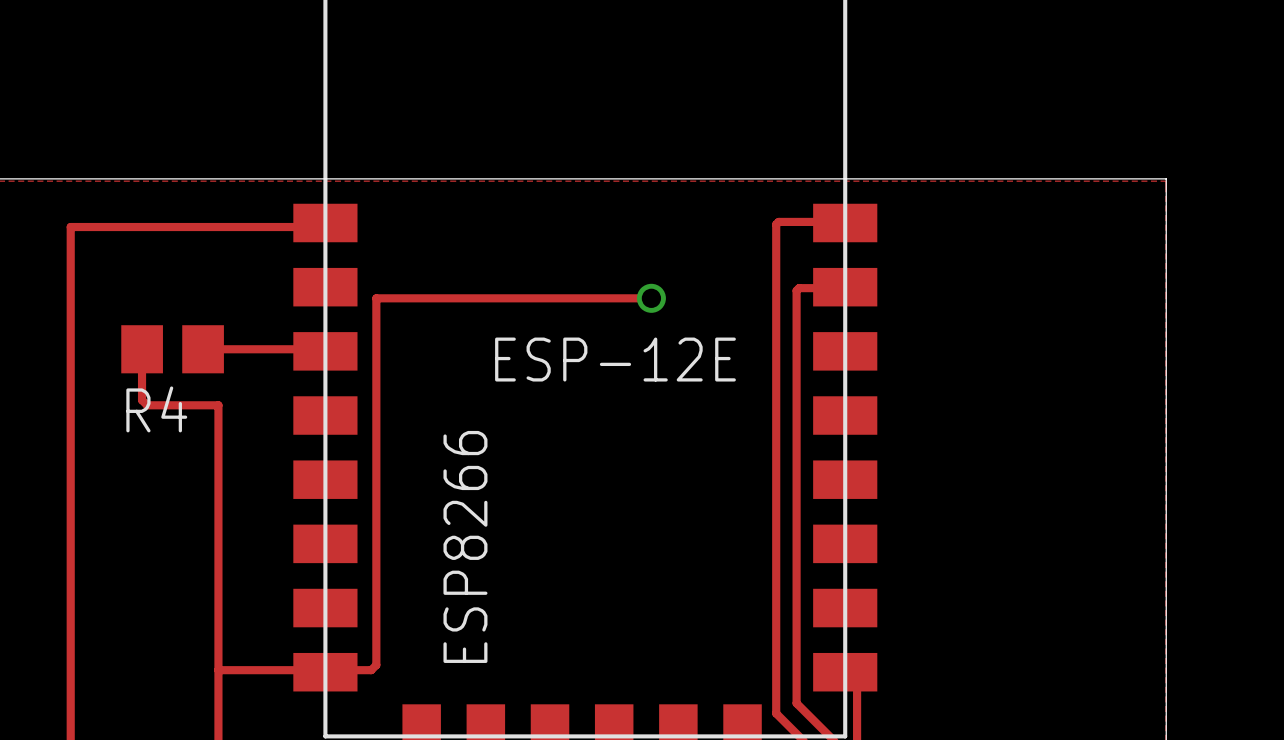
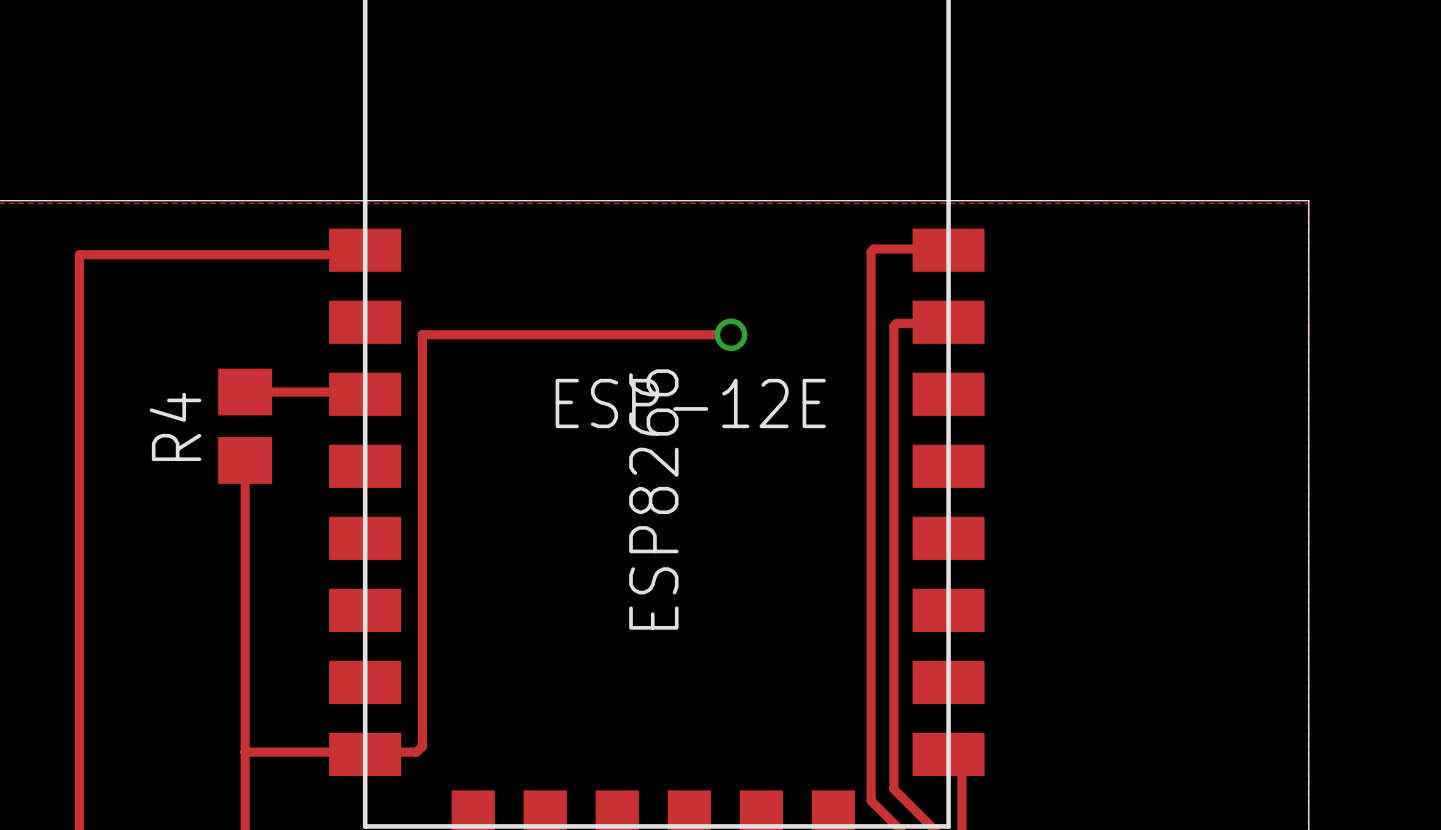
track: (142, 349) (142, 400) (147, 405) (218, 405) (218, 410) -> none
R4 rotation: 0° (172, 349) -> 90° clockwise (245, 426)
ESP8266 name position: ESP8266 (465, 546) -> ESP8266 (653, 499)

